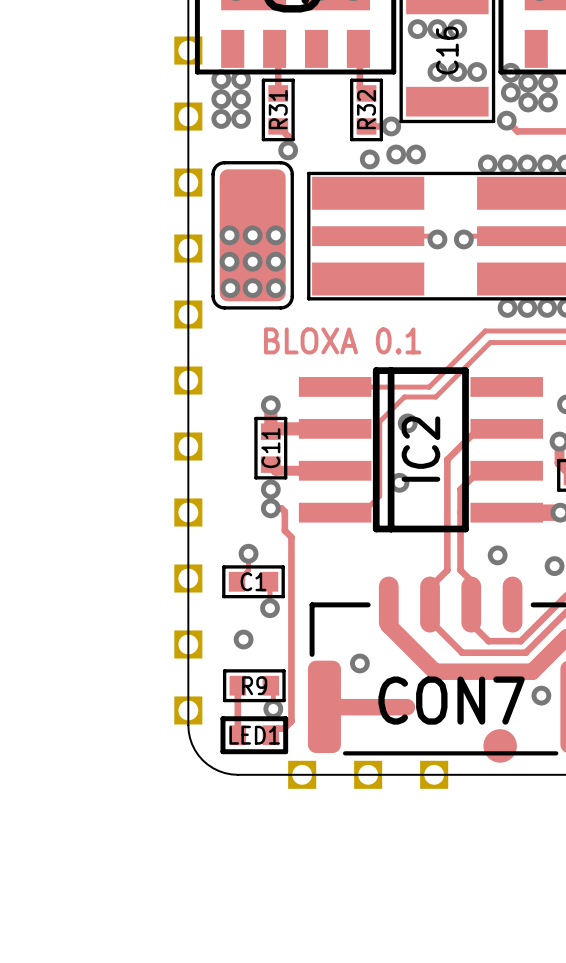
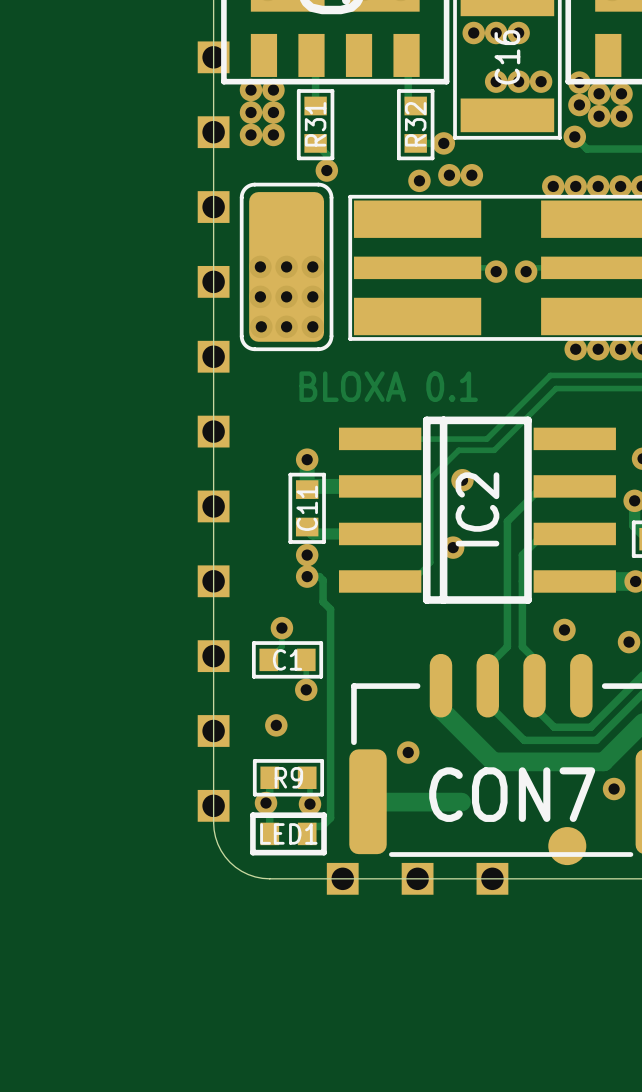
via: none -> (266, 803)

